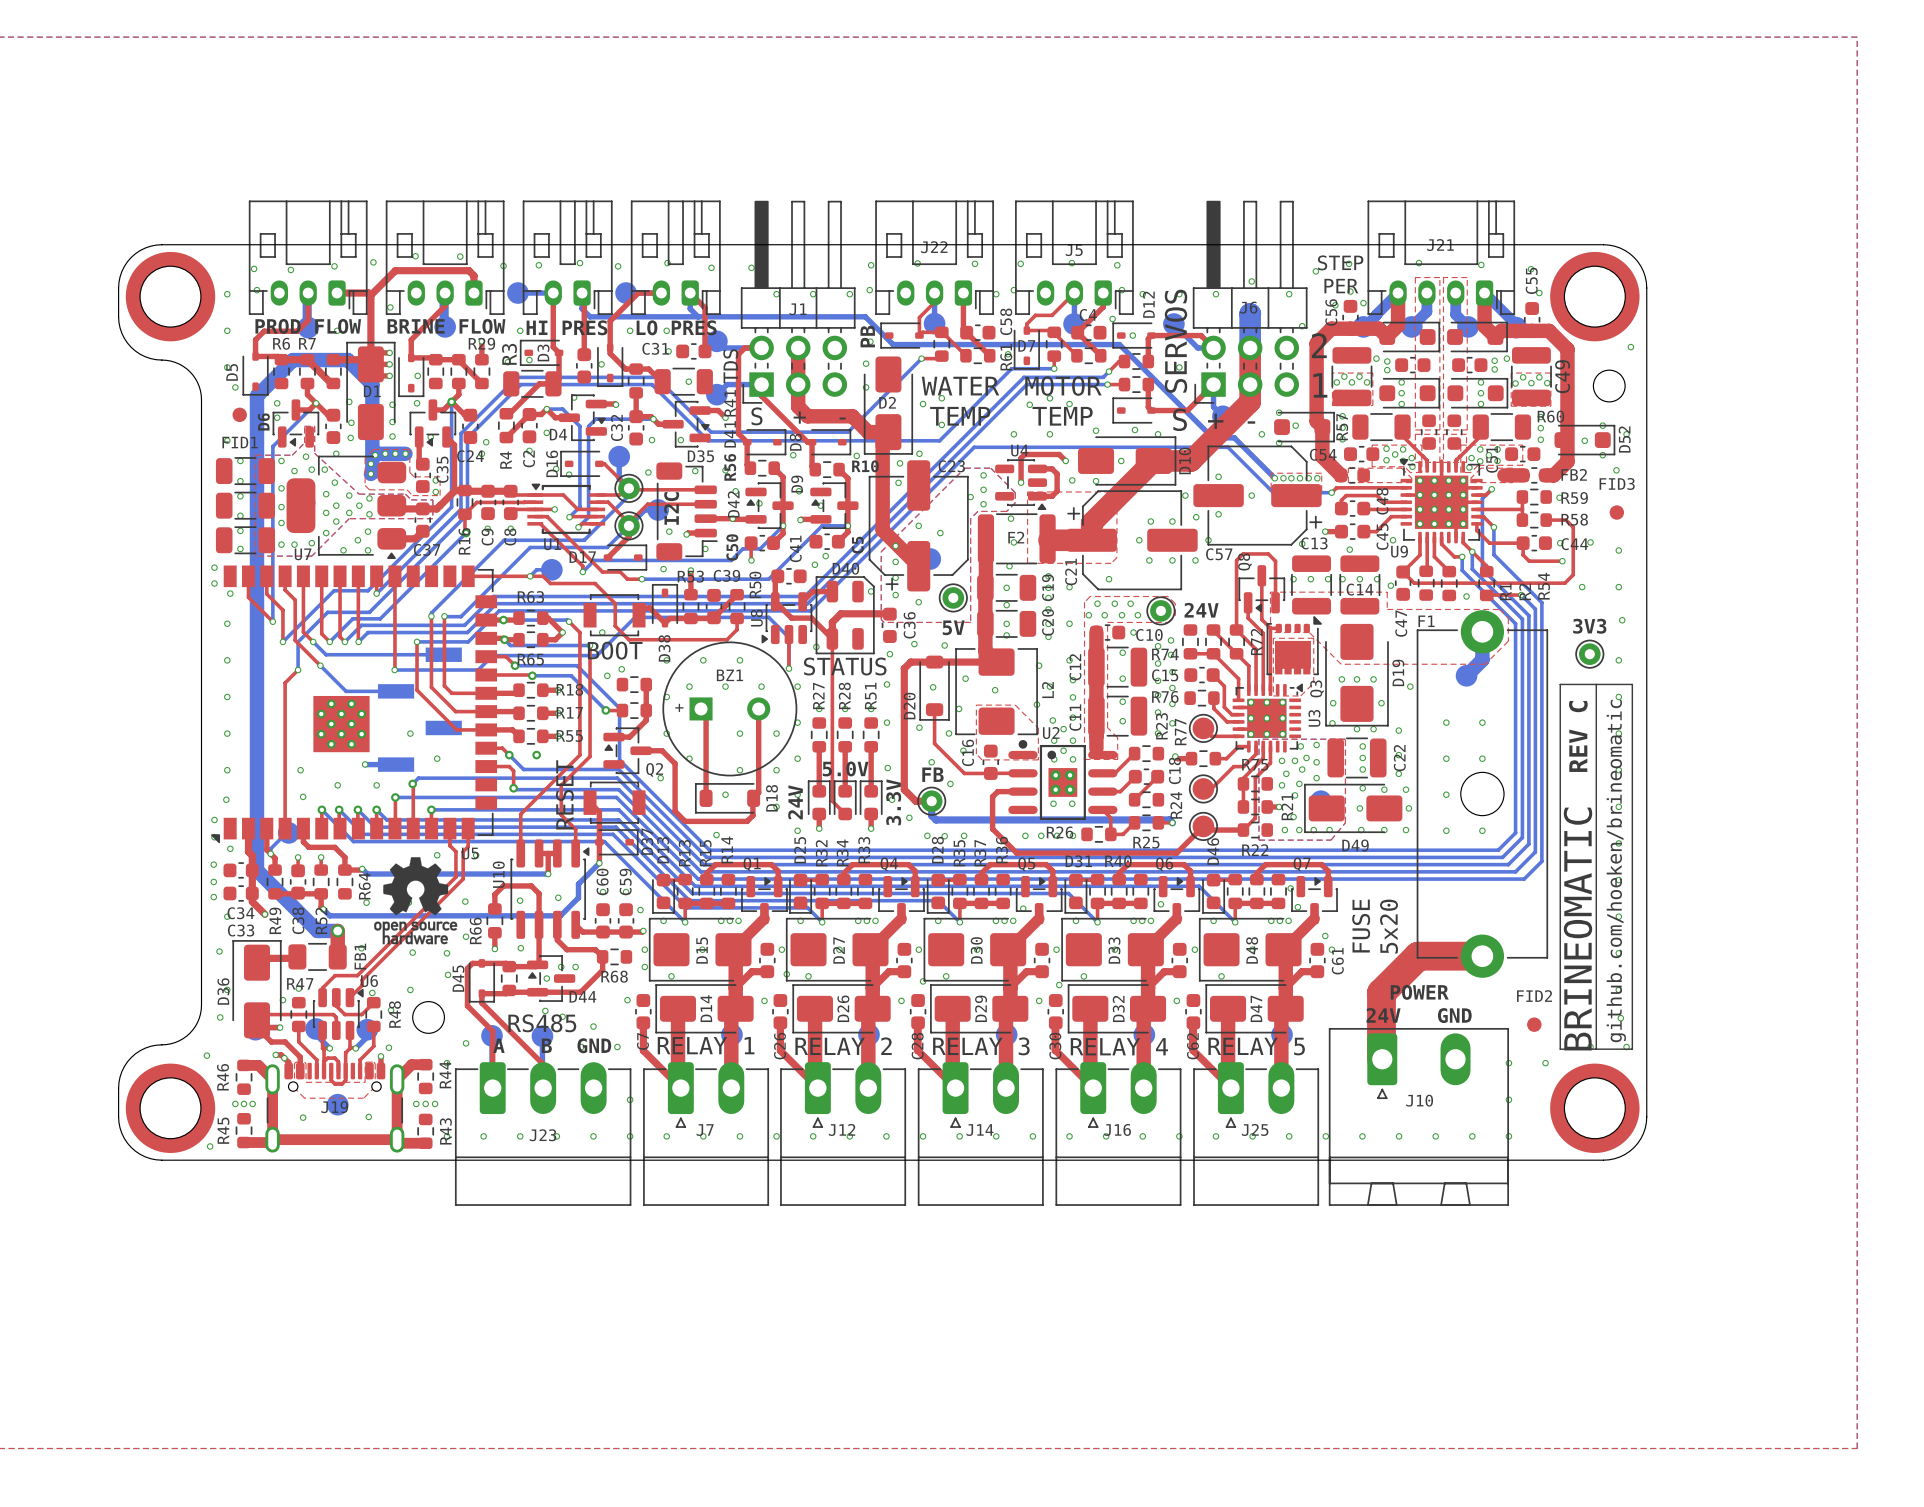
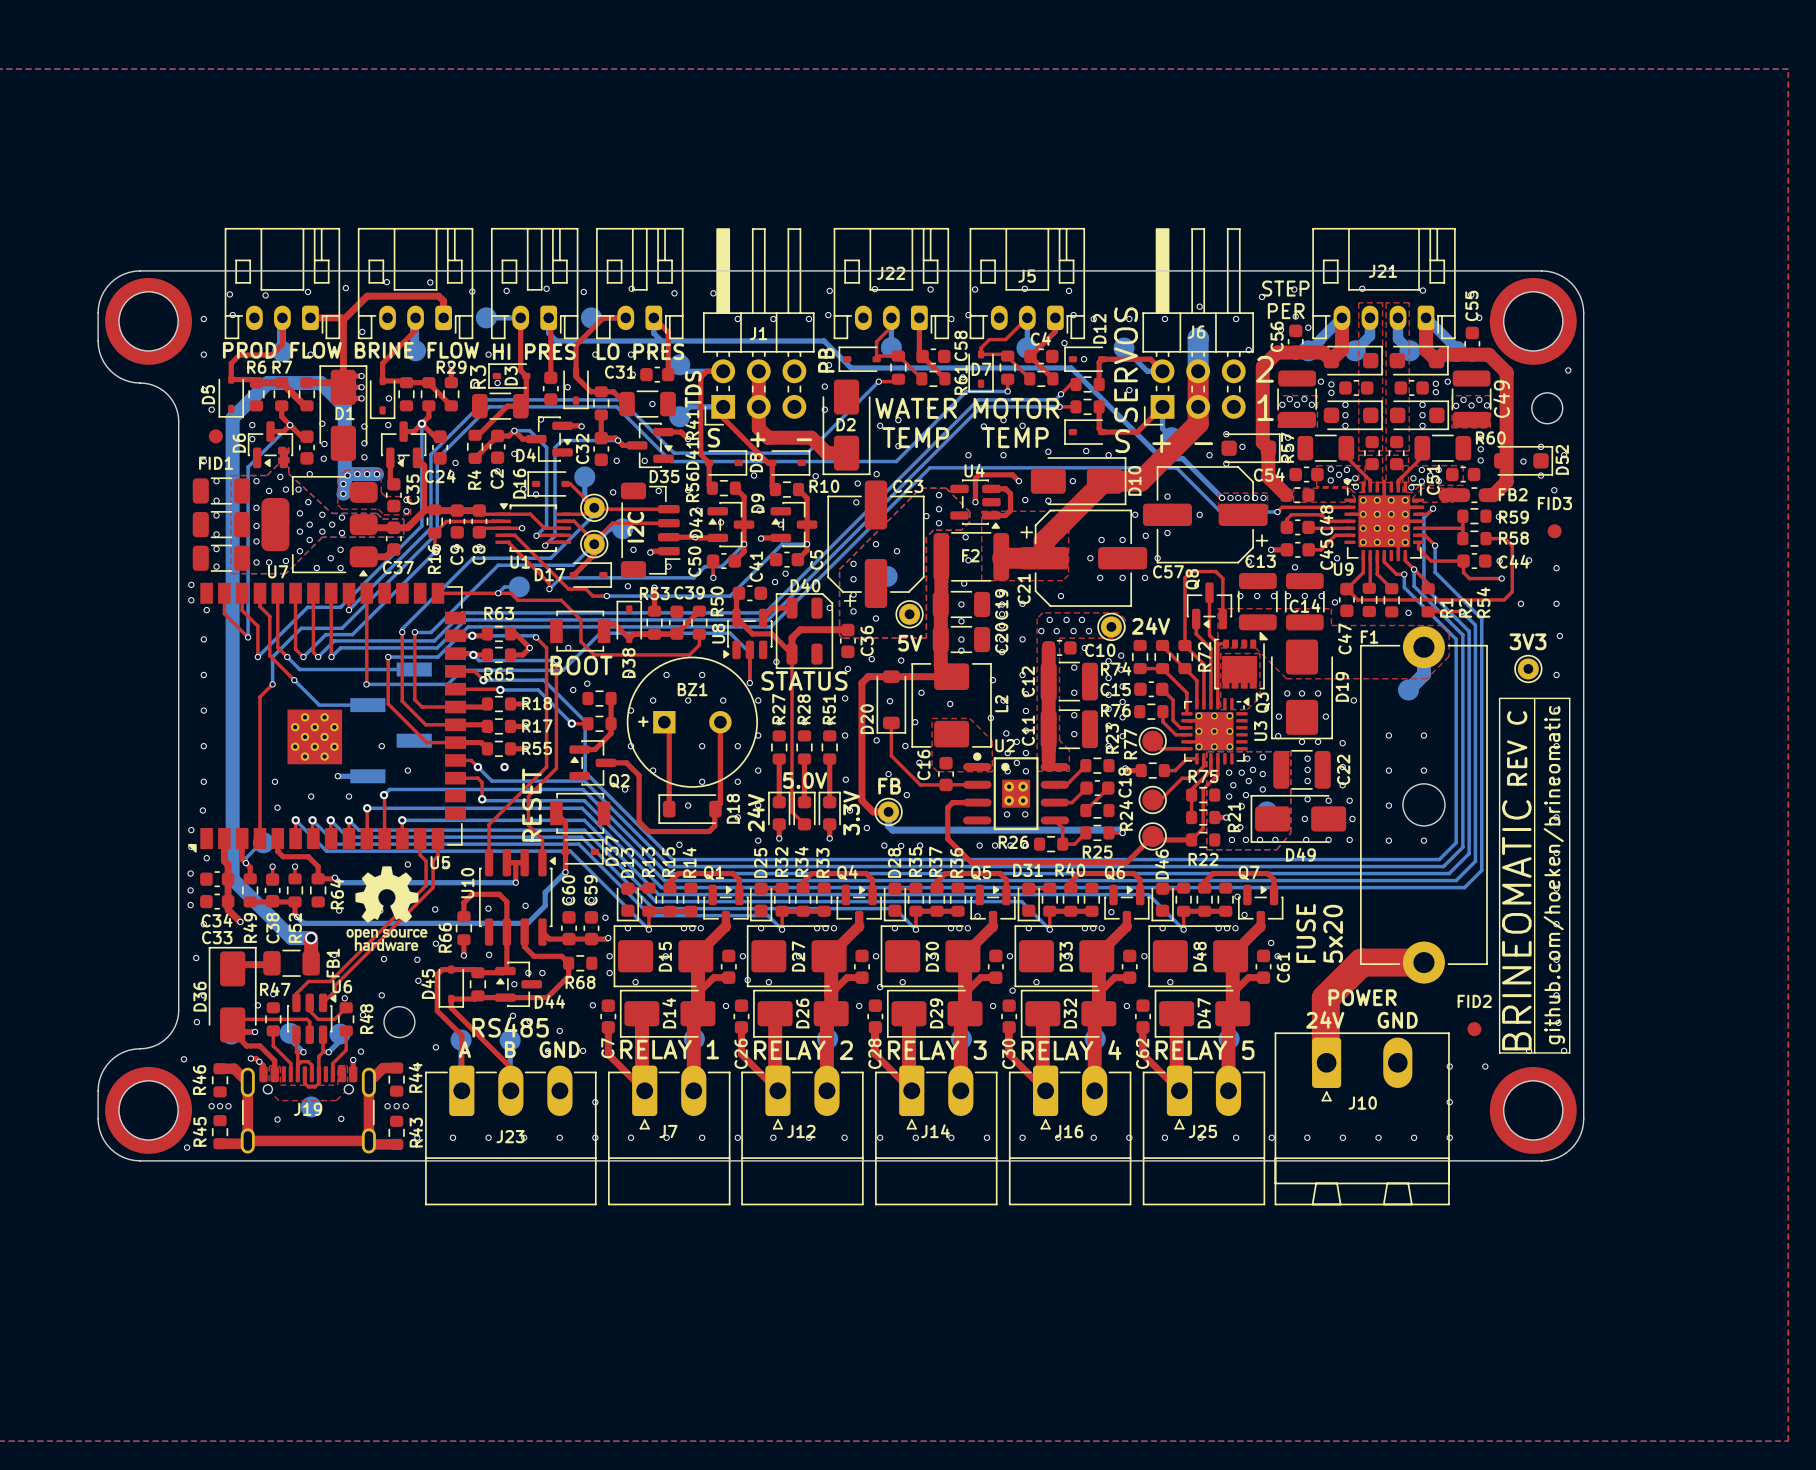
top track: (888, 432) (882, 437) (882, 530) (918, 566) -> none

